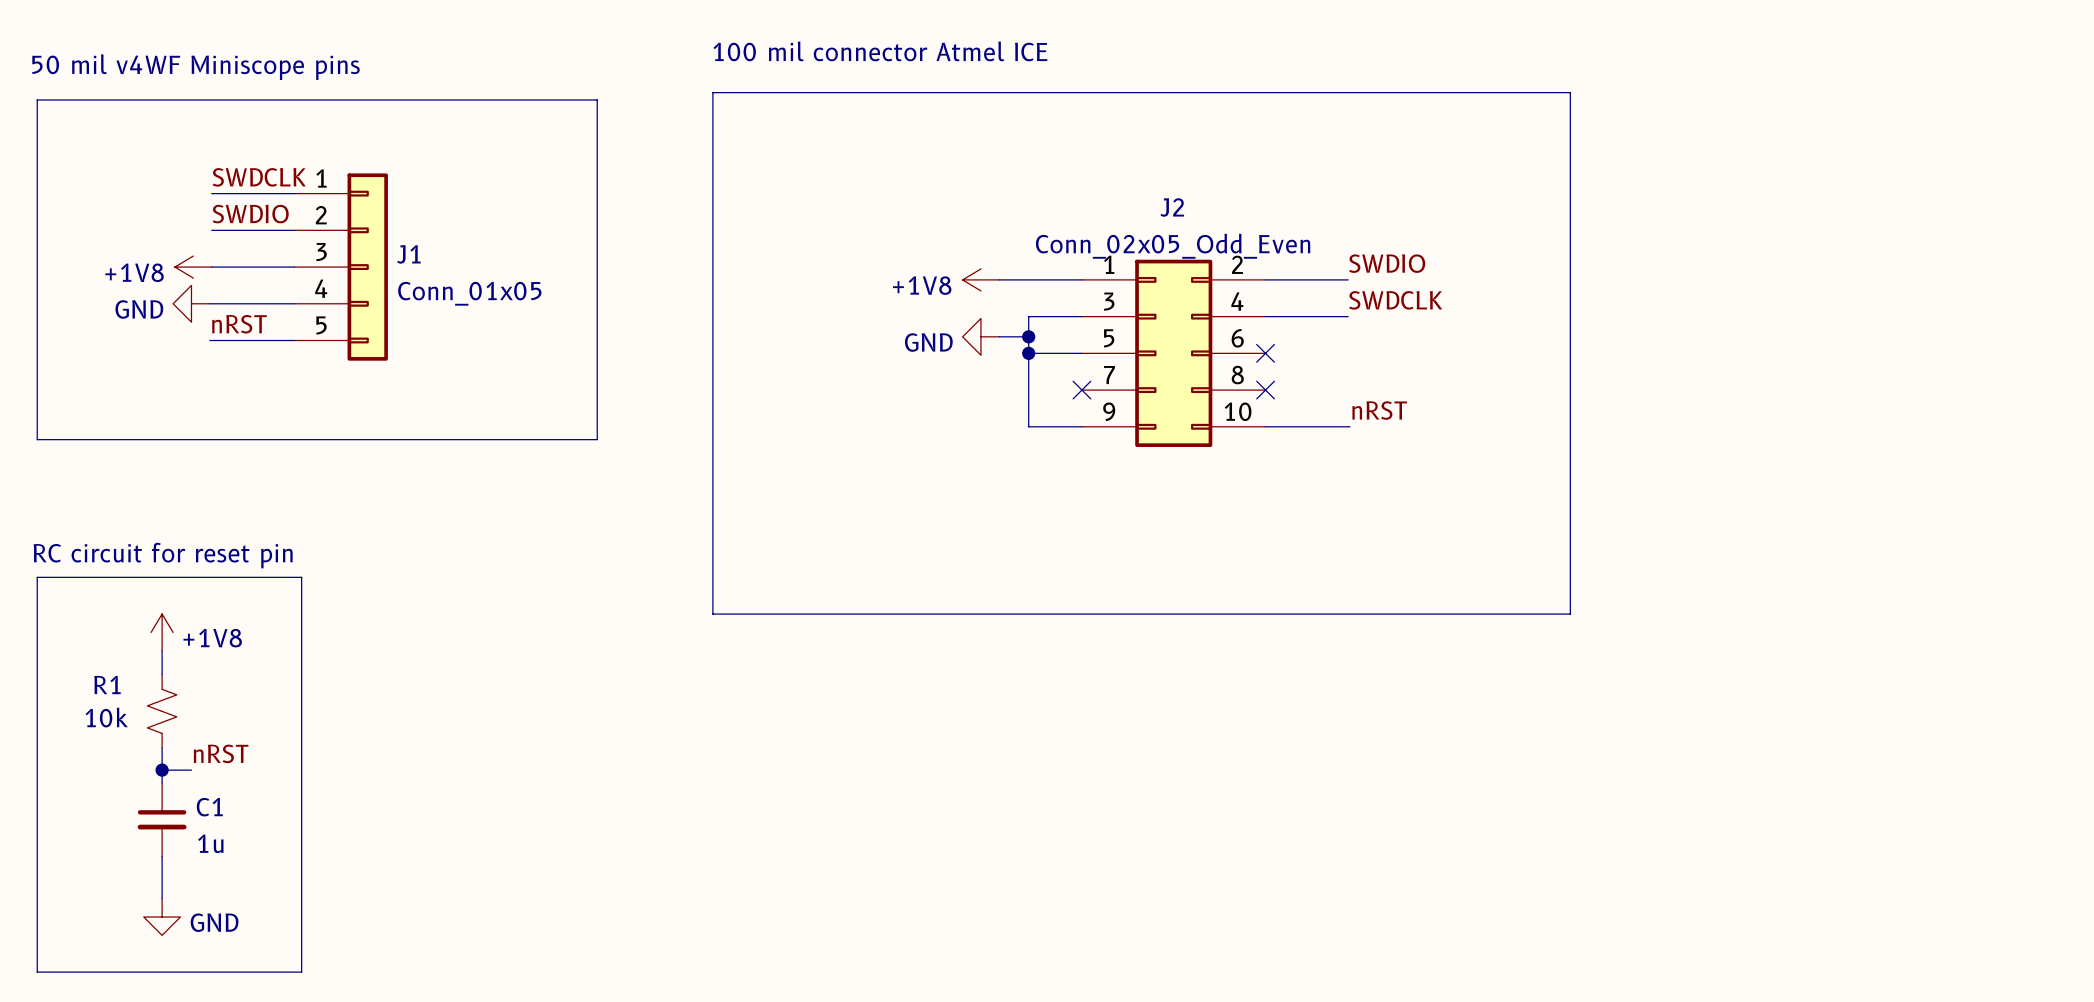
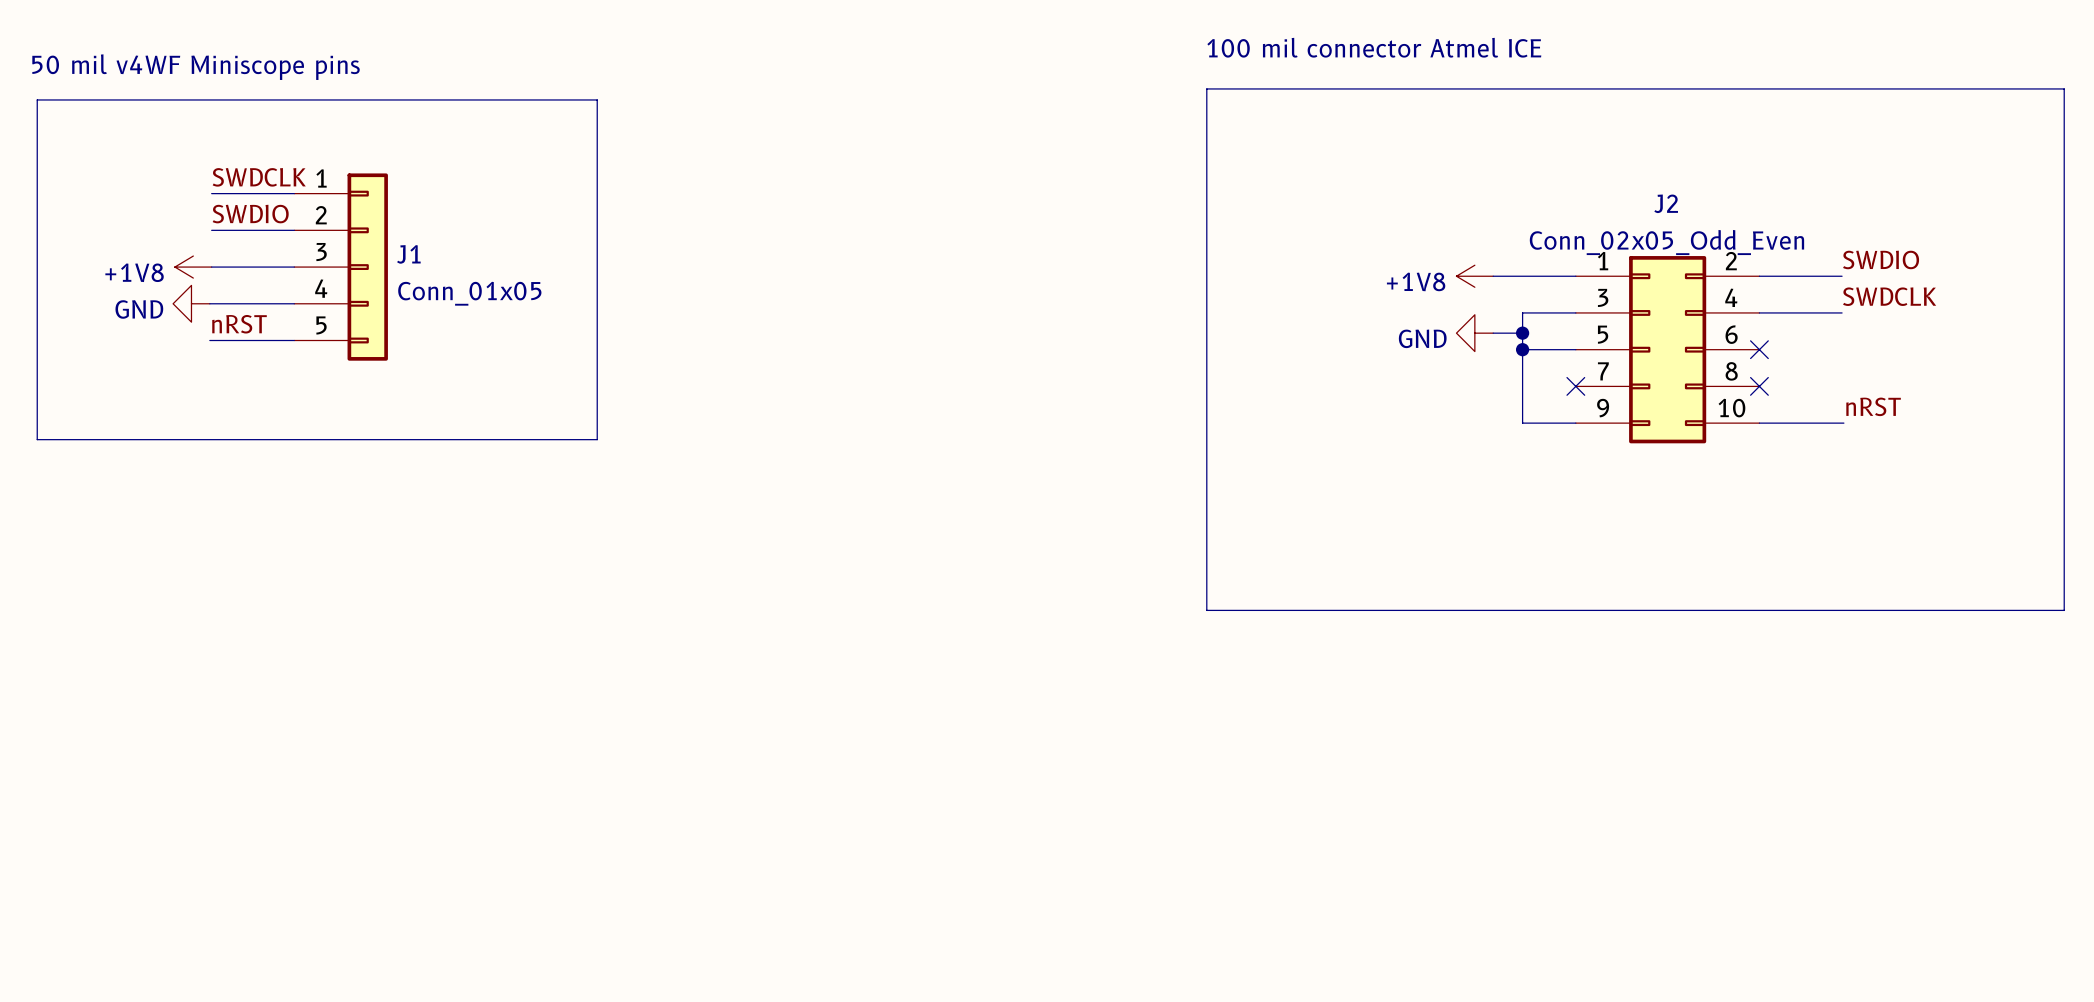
text: none -> 100 mil connector Atmel ICE (1374, 47)
text: 100 mil connector Atmel ICE (880, 51) -> none
line: none -> (1206, 88) (2064, 88) (2064, 610) (1206, 610) (1206, 88)
line: (712, 92) (1570, 92) (1570, 614) (712, 614) (712, 92) -> none
label: none -> SWDIO (1881, 259)
label: SWDIO (1387, 263) -> none
power symbol: none -> +1V8 (1474, 276)
wire: none -> (1759, 276) (1842, 276)
power symbol: +1V8 (980, 279) -> none
wire: (999, 279) (1081, 279) -> none
wire: (1265, 279) (1348, 279) -> (1493, 276) (1575, 276)
label: none -> SWDCLK (1889, 296)
label: SWDCLK (1395, 300) -> none
wire: none -> (1575, 312) (1522, 312) (1522, 423) (1575, 423)
wire: none -> (1759, 312) (1842, 312)
wire: (1081, 316) (1028, 316) (1028, 426) (1081, 426) -> none
wire: (1265, 316) (1348, 316) -> none
power symbol: none -> GND (1474, 333)
wire: none -> (1493, 333) (1522, 333)
junction: none -> (1522, 333)
power symbol: GND (980, 336) -> none
wire: (999, 336) (1028, 336) -> none
junction: (1028, 336) -> none
wire: none -> (1522, 349) (1575, 349)
junction: none -> (1522, 349)
no-connect mark: none -> (1759, 349)
wire: (1028, 353) (1081, 353) -> none
junction: (1028, 353) -> none
J2 position: (1173, 353) -> (1667, 349)
no-connect mark: (1265, 353) -> none
no-connect mark: none -> (1575, 386)
no-connect mark: none -> (1759, 386)
no-connect mark: (1081, 390) -> none
no-connect mark: (1265, 390) -> none
label: none -> nRST (1873, 406)
label: nRST (1379, 410) -> none
wire: none -> (1759, 423) (1843, 423)
wire: (1265, 426) (1350, 426) -> none
text: RC circuit for reset pin (163, 555) -> none
line: (37, 577) (301, 577) (301, 972) (37, 972) (37, 577) -> none
power symbol: +1V8 (162, 632) -> none
wire: (162, 650) (162, 674) -> none
R1: 10k (162, 711) -> none
wire: (162, 748) (162, 782) -> none
label: nRST (221, 753) -> none
wire: (162, 770) (191, 770) -> none
junction: (162, 770) -> none
C1: 1u (162, 819) -> none
wire: (162, 856) (162, 898) -> none
power symbol: GND (162, 917) -> none

